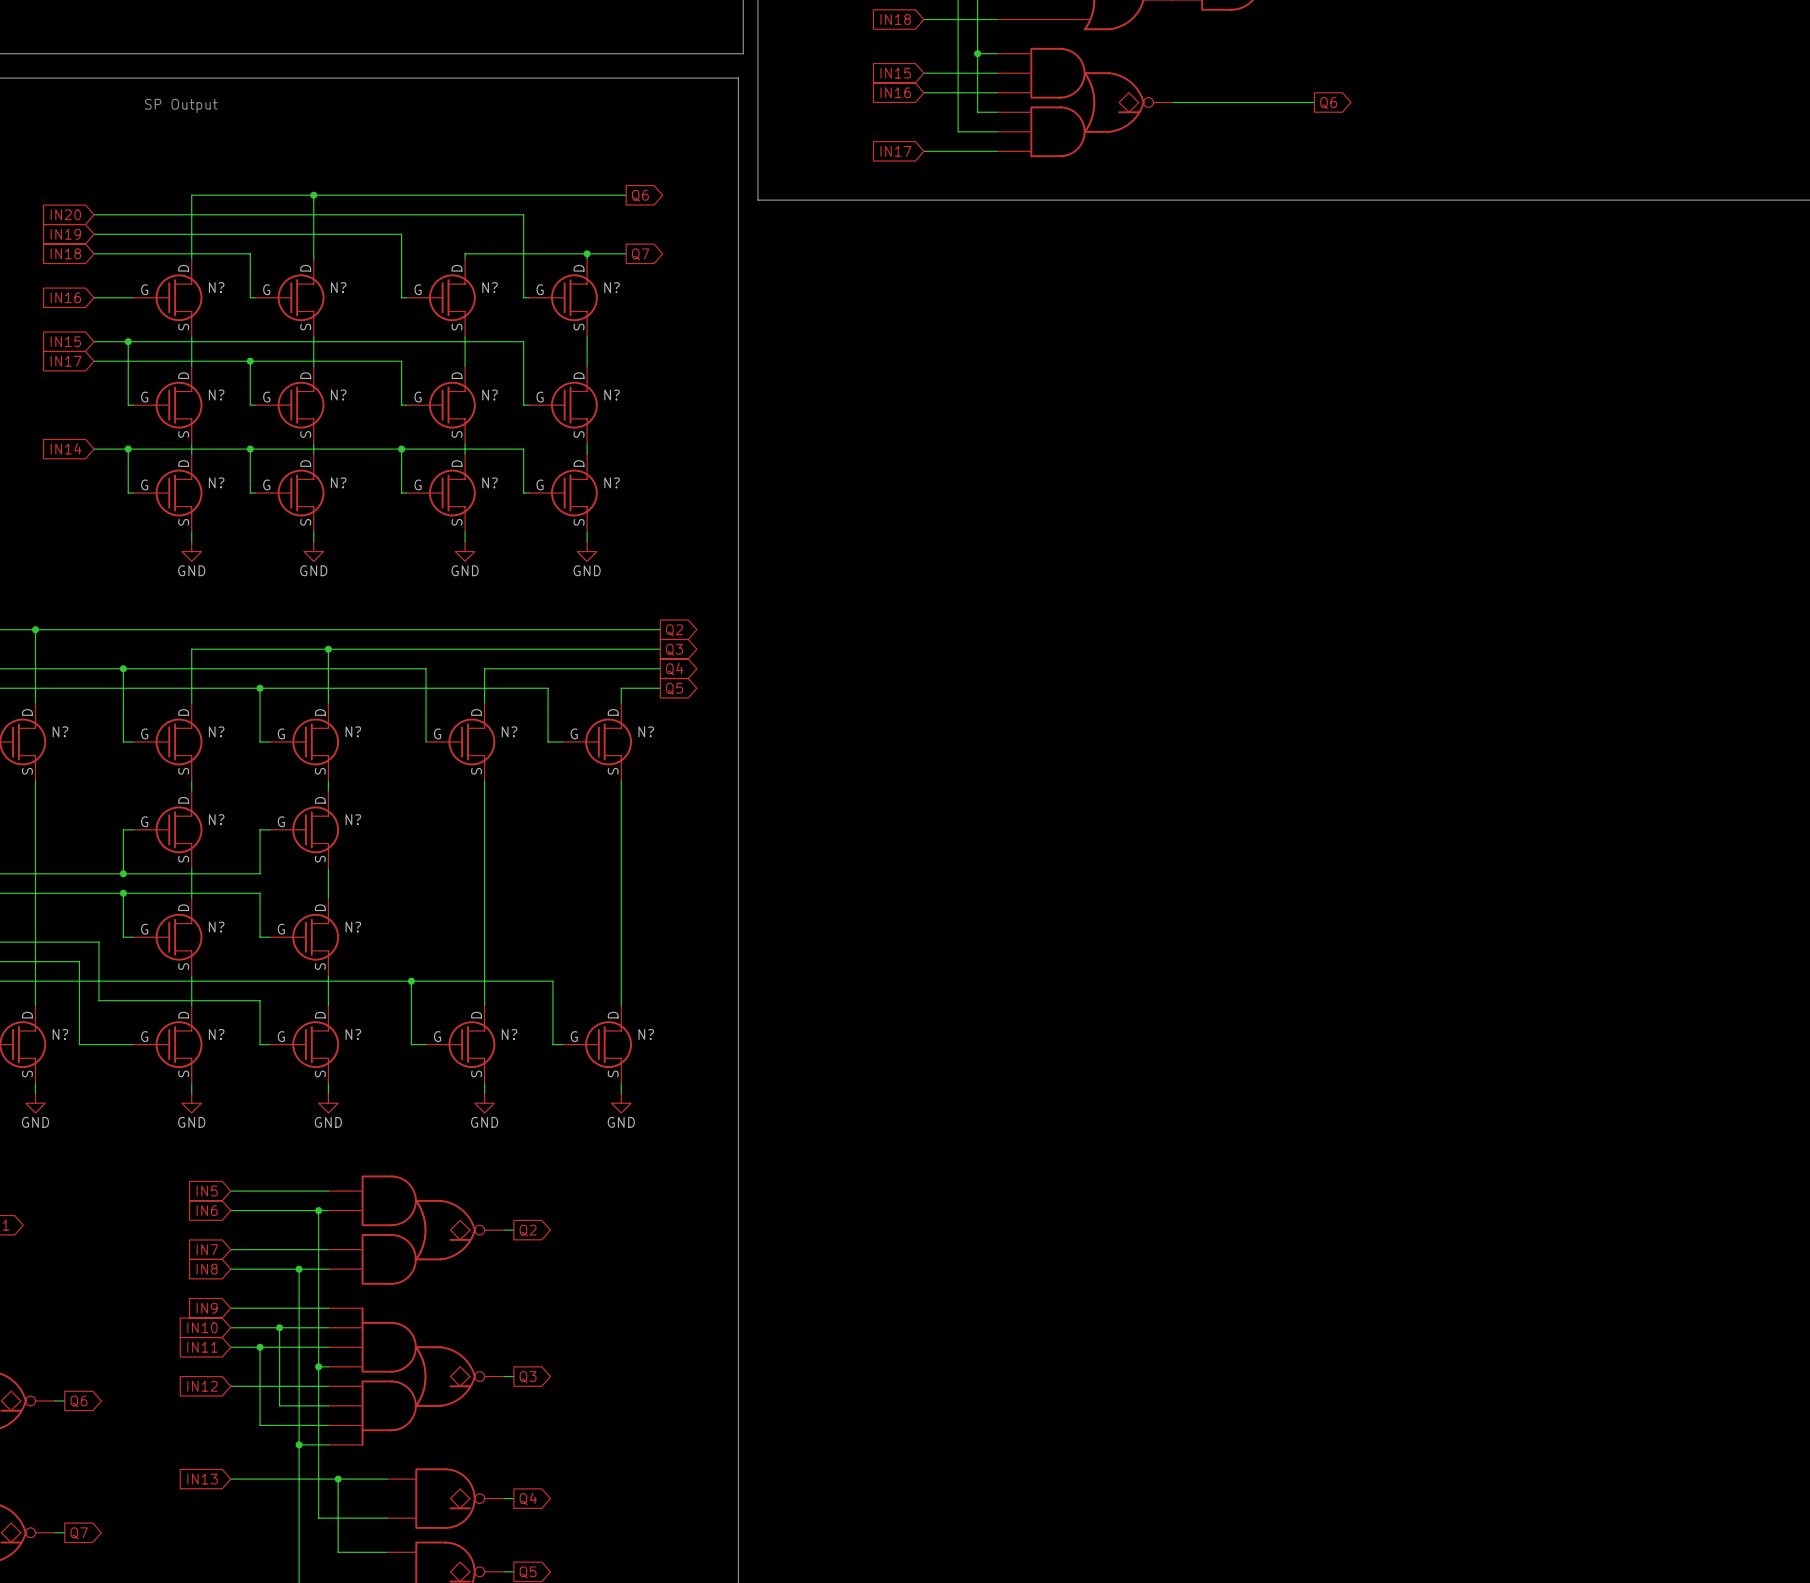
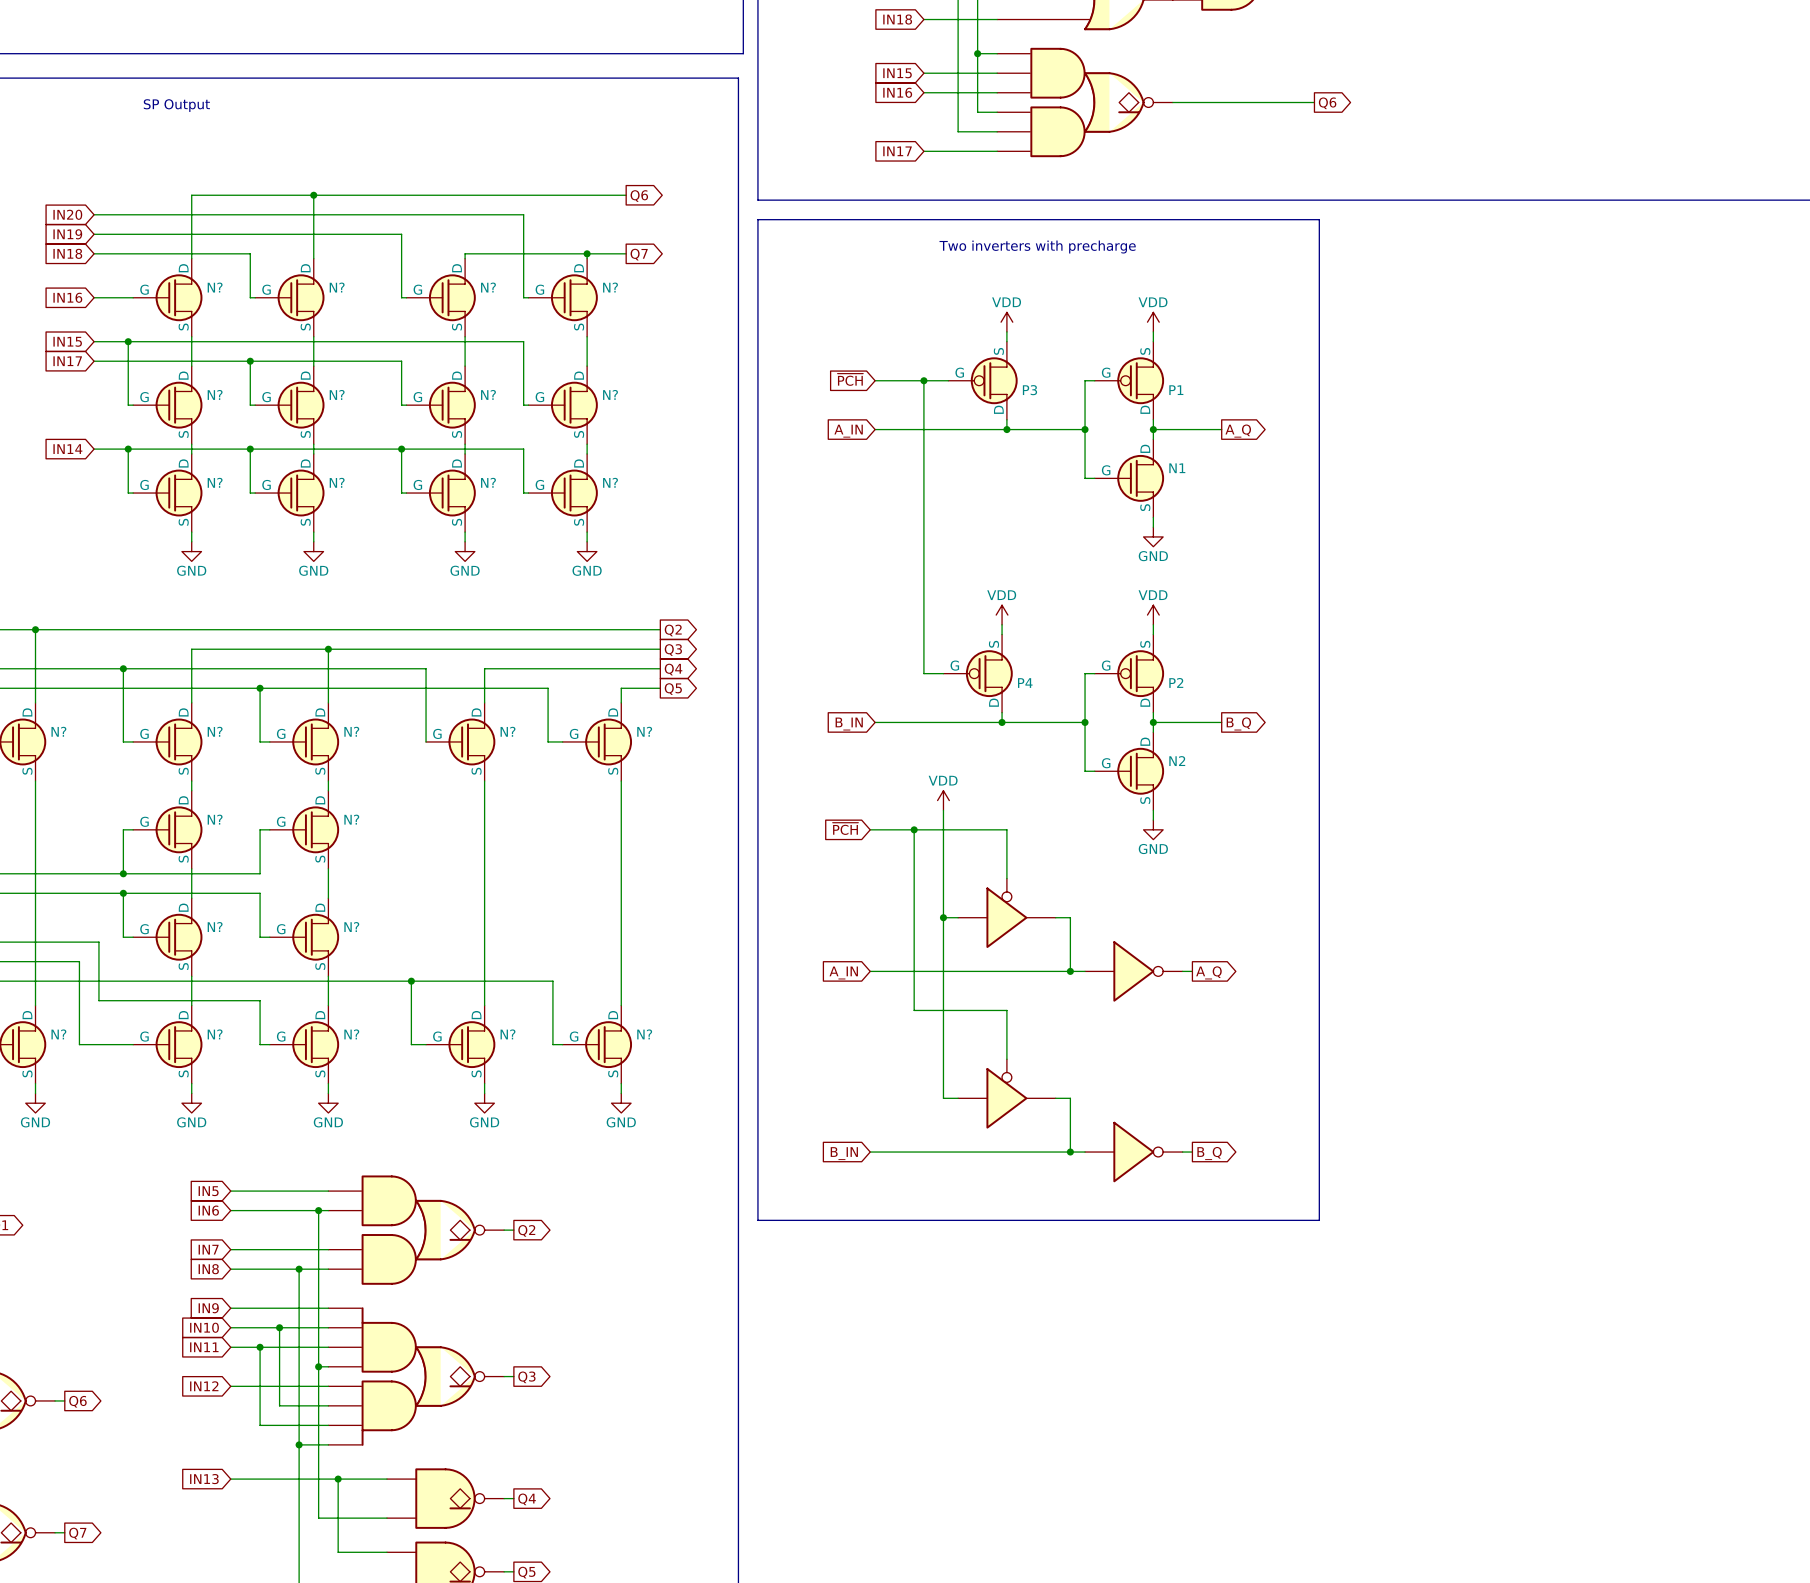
line: none -> (757, 219) (1319, 219) (1319, 1220) (757, 1220) (757, 219)
text: none -> Two inverters with precharge (1037, 247)
power symbol: none -> VDD (1006, 322)
power symbol: none -> VDD (1153, 322)
wire: none -> (1006, 331) (1006, 341)
wire: none -> (1153, 331) (1153, 341)
global label: none -> ~{PCH} (850, 379)
wire: none -> (875, 380) (948, 380)
wire: none -> (923, 380) (923, 673) (943, 673)
junction: none -> (923, 380)
P3: none -> (983, 380)
wire: none -> (1094, 380) (1085, 380) (1085, 478) (1094, 478)
P1: none -> (1129, 380)
wire: none -> (1006, 419) (1006, 429)
wire: none -> (1153, 419) (1153, 439)
wire: none -> (875, 429) (1085, 429)
junction: none -> (1006, 429)
junction: none -> (1085, 429)
wire: none -> (1153, 429) (1221, 429)
junction: none -> (1153, 429)
global label: none -> A_IN (848, 431)
global label: none -> A_Q (1238, 431)
N1: none -> (1129, 478)
wire: none -> (1153, 517) (1153, 527)
power symbol: none -> GND (1153, 536)
power symbol: none -> VDD (1002, 615)
power symbol: none -> VDD (1153, 615)
wire: none -> (1002, 624) (1002, 634)
wire: none -> (1153, 624) (1153, 634)
P4: none -> (978, 673)
wire: none -> (1094, 673) (1085, 673) (1085, 771) (1094, 771)
P2: none -> (1129, 673)
wire: none -> (1002, 712) (1002, 722)
wire: none -> (1153, 712) (1153, 732)
global label: none -> B_IN (849, 724)
wire: none -> (875, 722) (1085, 722)
junction: none -> (1002, 722)
junction: none -> (1085, 722)
wire: none -> (1153, 722) (1221, 722)
junction: none -> (1153, 722)
global label: none -> B_Q (1238, 723)
N2: none -> (1129, 771)
power symbol: none -> VDD (943, 800)
wire: none -> (943, 810) (943, 1098) (958, 1098)
wire: none -> (1153, 810) (1153, 820)
global label: none -> ~{PCH} (845, 828)
wire: none -> (870, 829) (1006, 829) (1006, 878)
wire: none -> (914, 829) (914, 1010) (1006, 1010) (1006, 1059)
junction: none -> (914, 829)
power symbol: none -> GND (1153, 829)
part: none -> (1006, 913)
wire: none -> (943, 917) (958, 917)
junction: none -> (943, 917)
wire: none -> (1055, 917) (1070, 917) (1070, 971)
global label: none -> A_IN (843, 972)
wire: none -> (870, 971) (1085, 971)
junction: none -> (1070, 971)
part: none -> (1133, 971)
wire: none -> (1182, 971) (1192, 971)
global label: none -> A_Q (1208, 972)
part: none -> (1006, 1093)
wire: none -> (1055, 1098) (1070, 1098) (1070, 1152)
global label: none -> B_IN (844, 1153)
wire: none -> (870, 1152) (1085, 1152)
junction: none -> (1070, 1152)
part: none -> (1133, 1152)
wire: none -> (1182, 1152) (1192, 1152)
global label: none -> B_Q (1209, 1153)

